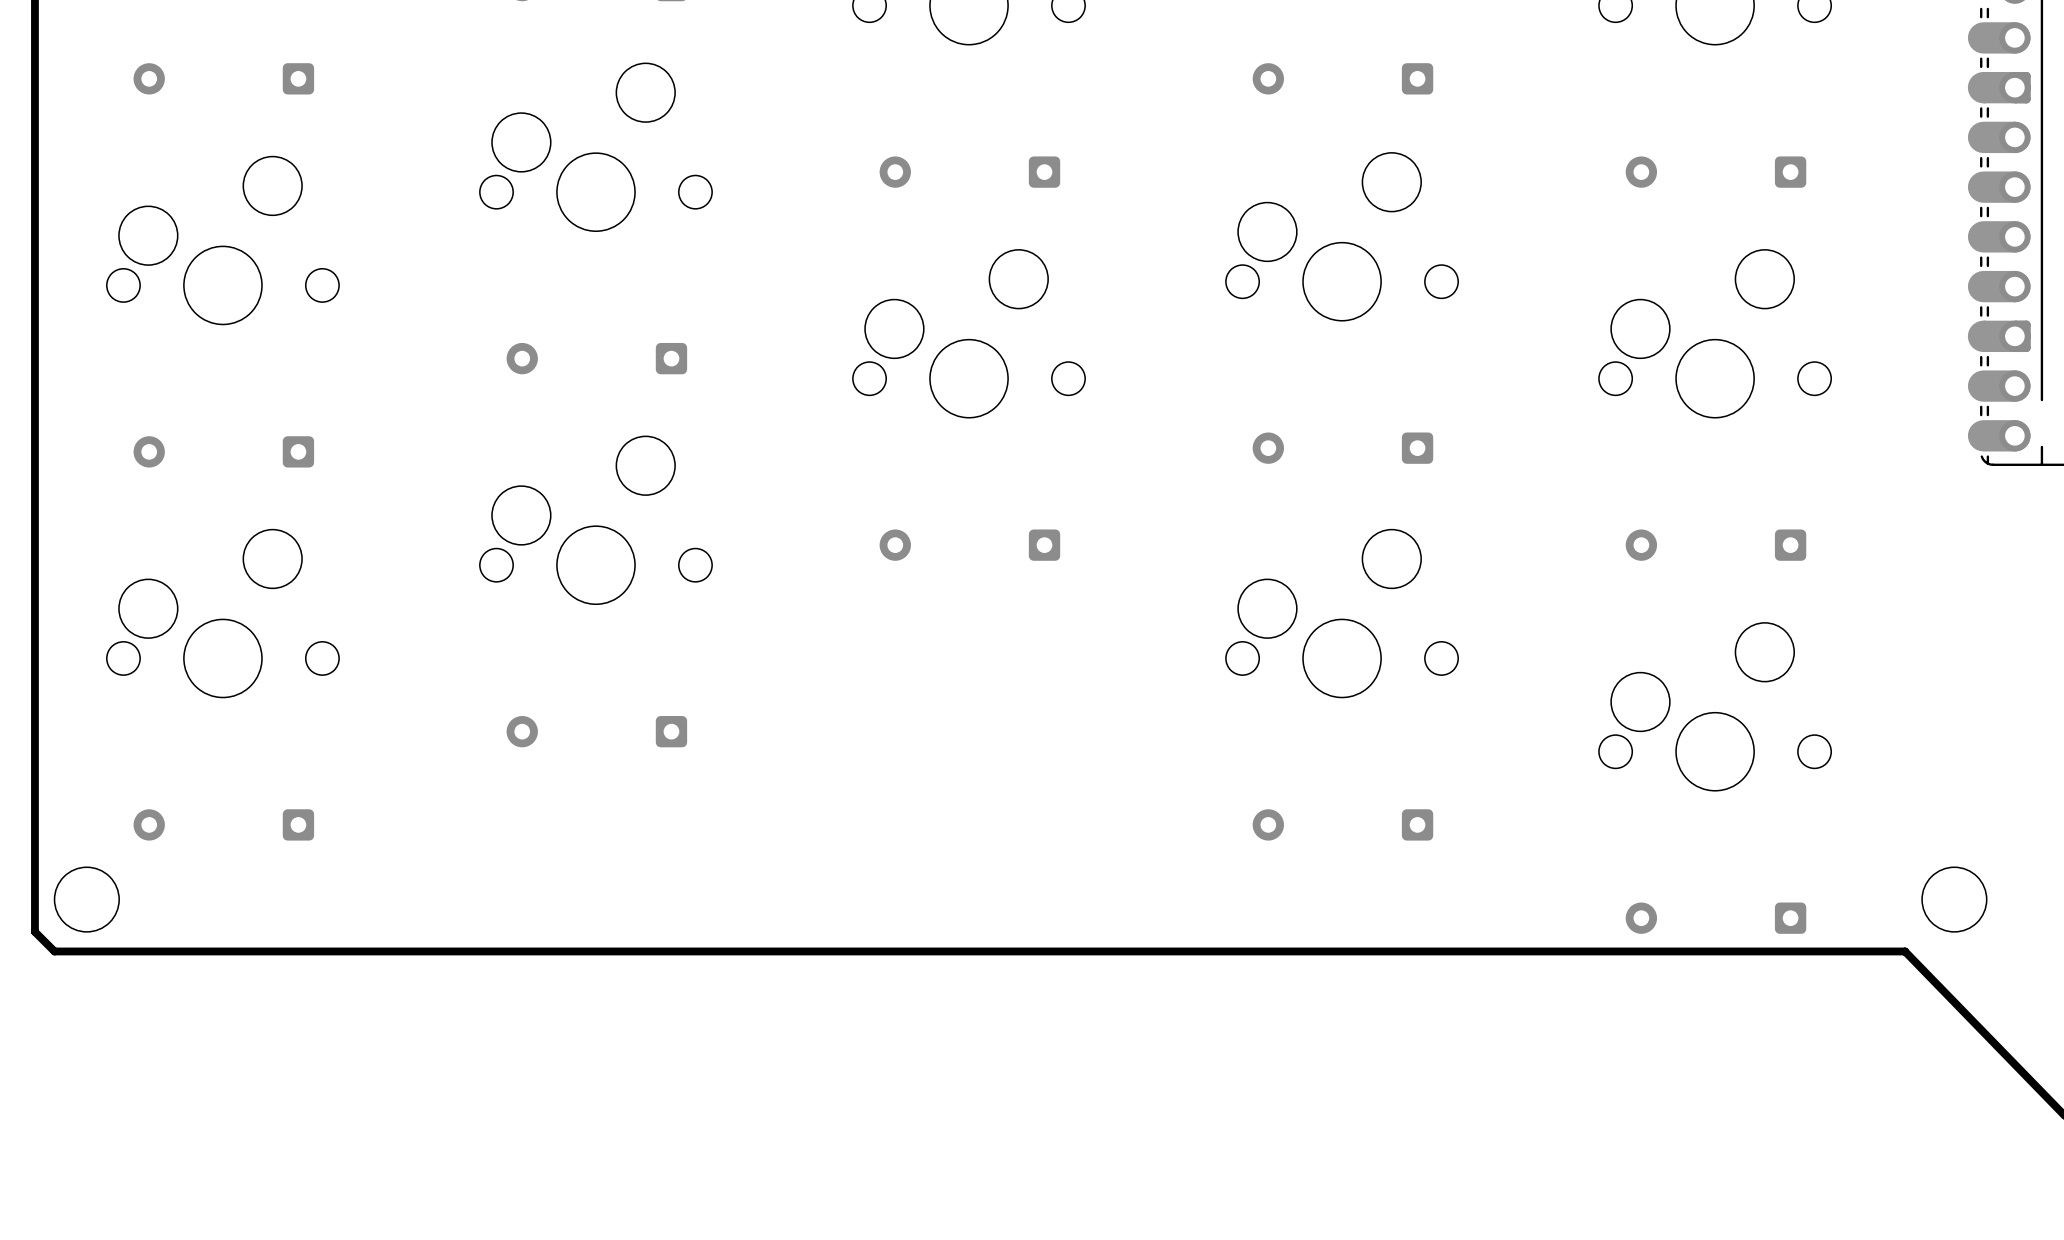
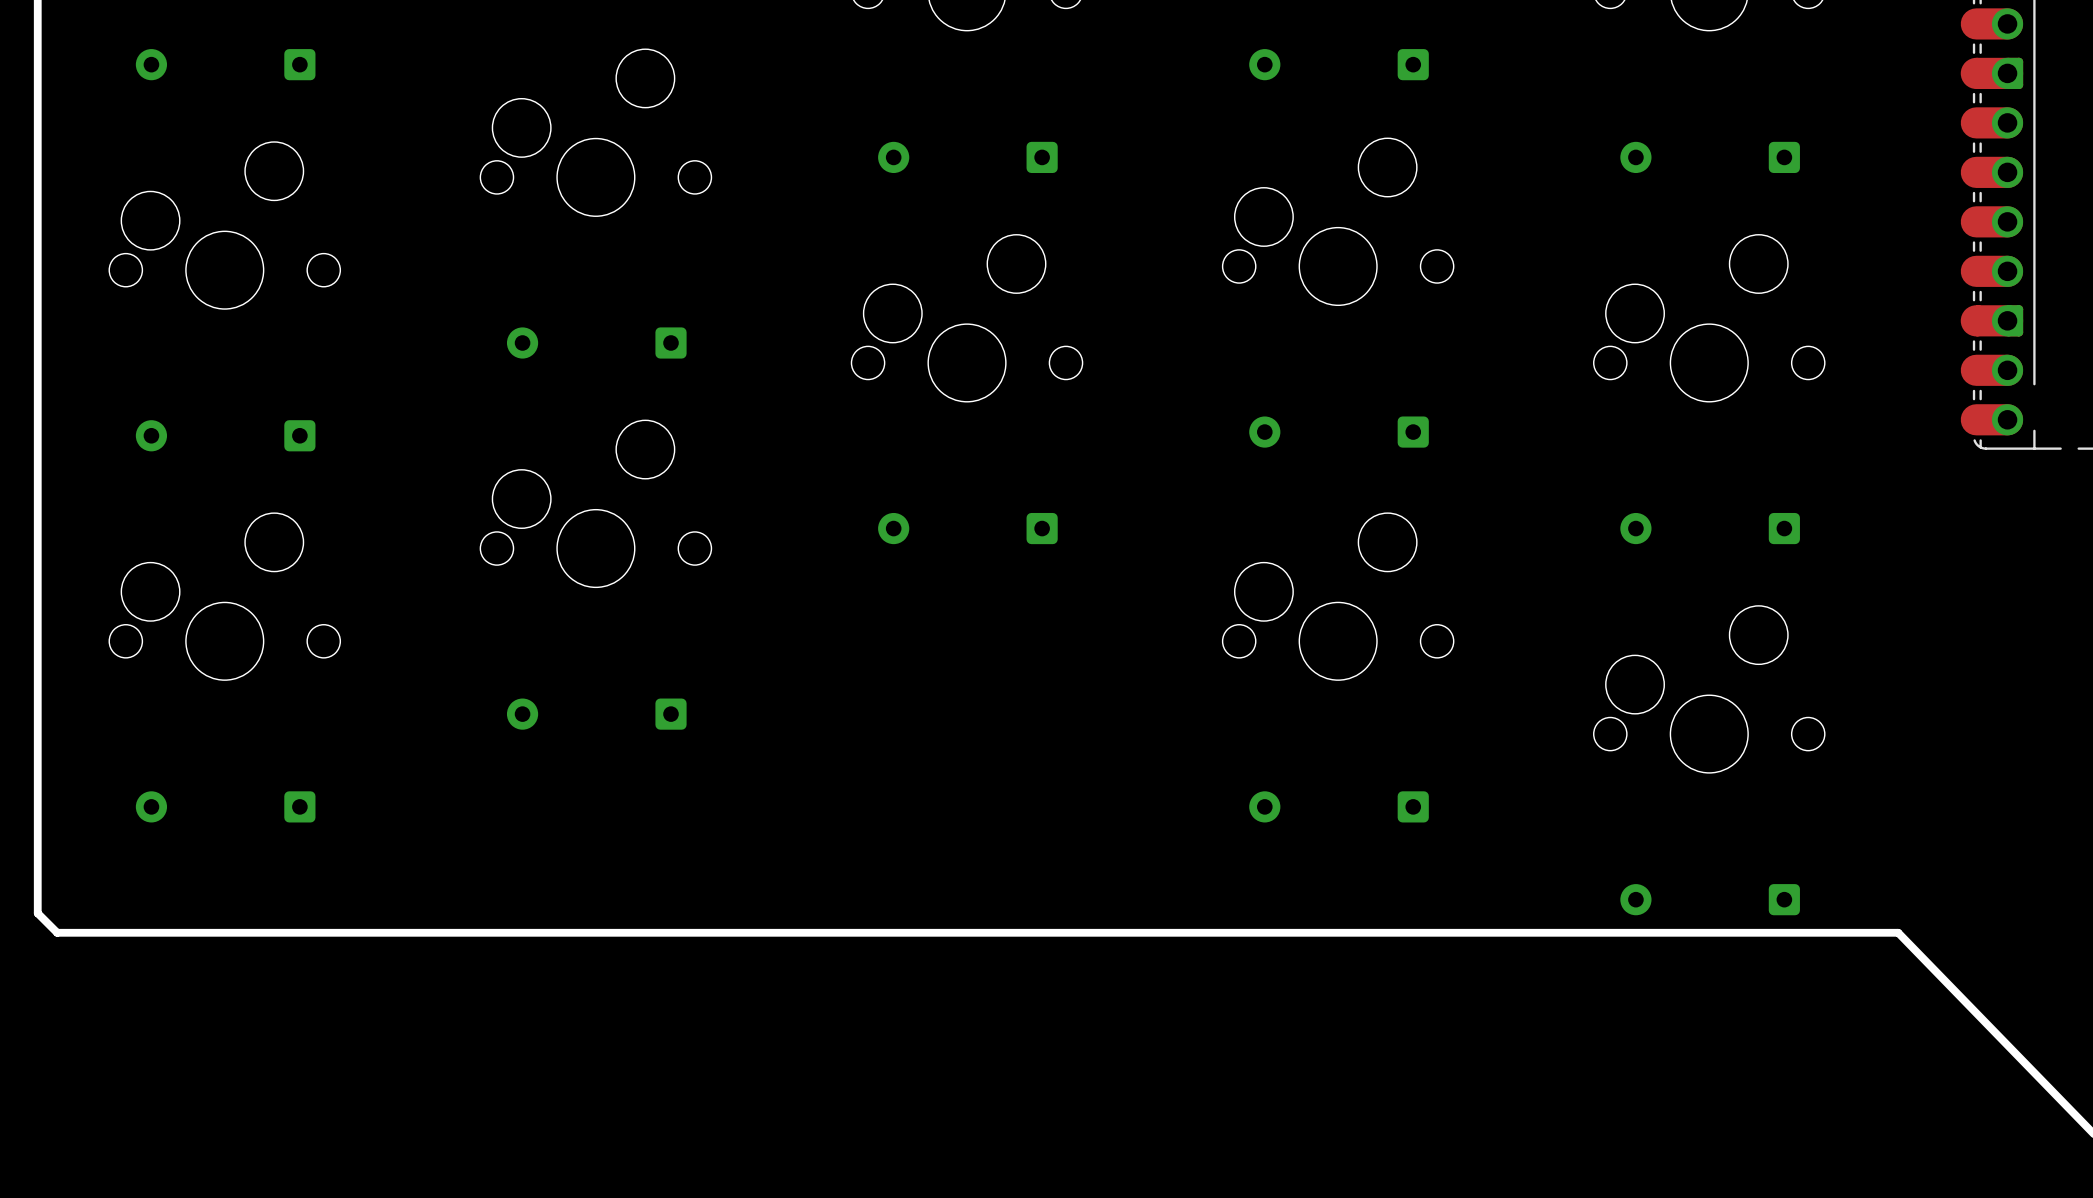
round board edge: [54, 866, 120, 933] -> none
round board edge: [1921, 866, 1988, 933] -> none

